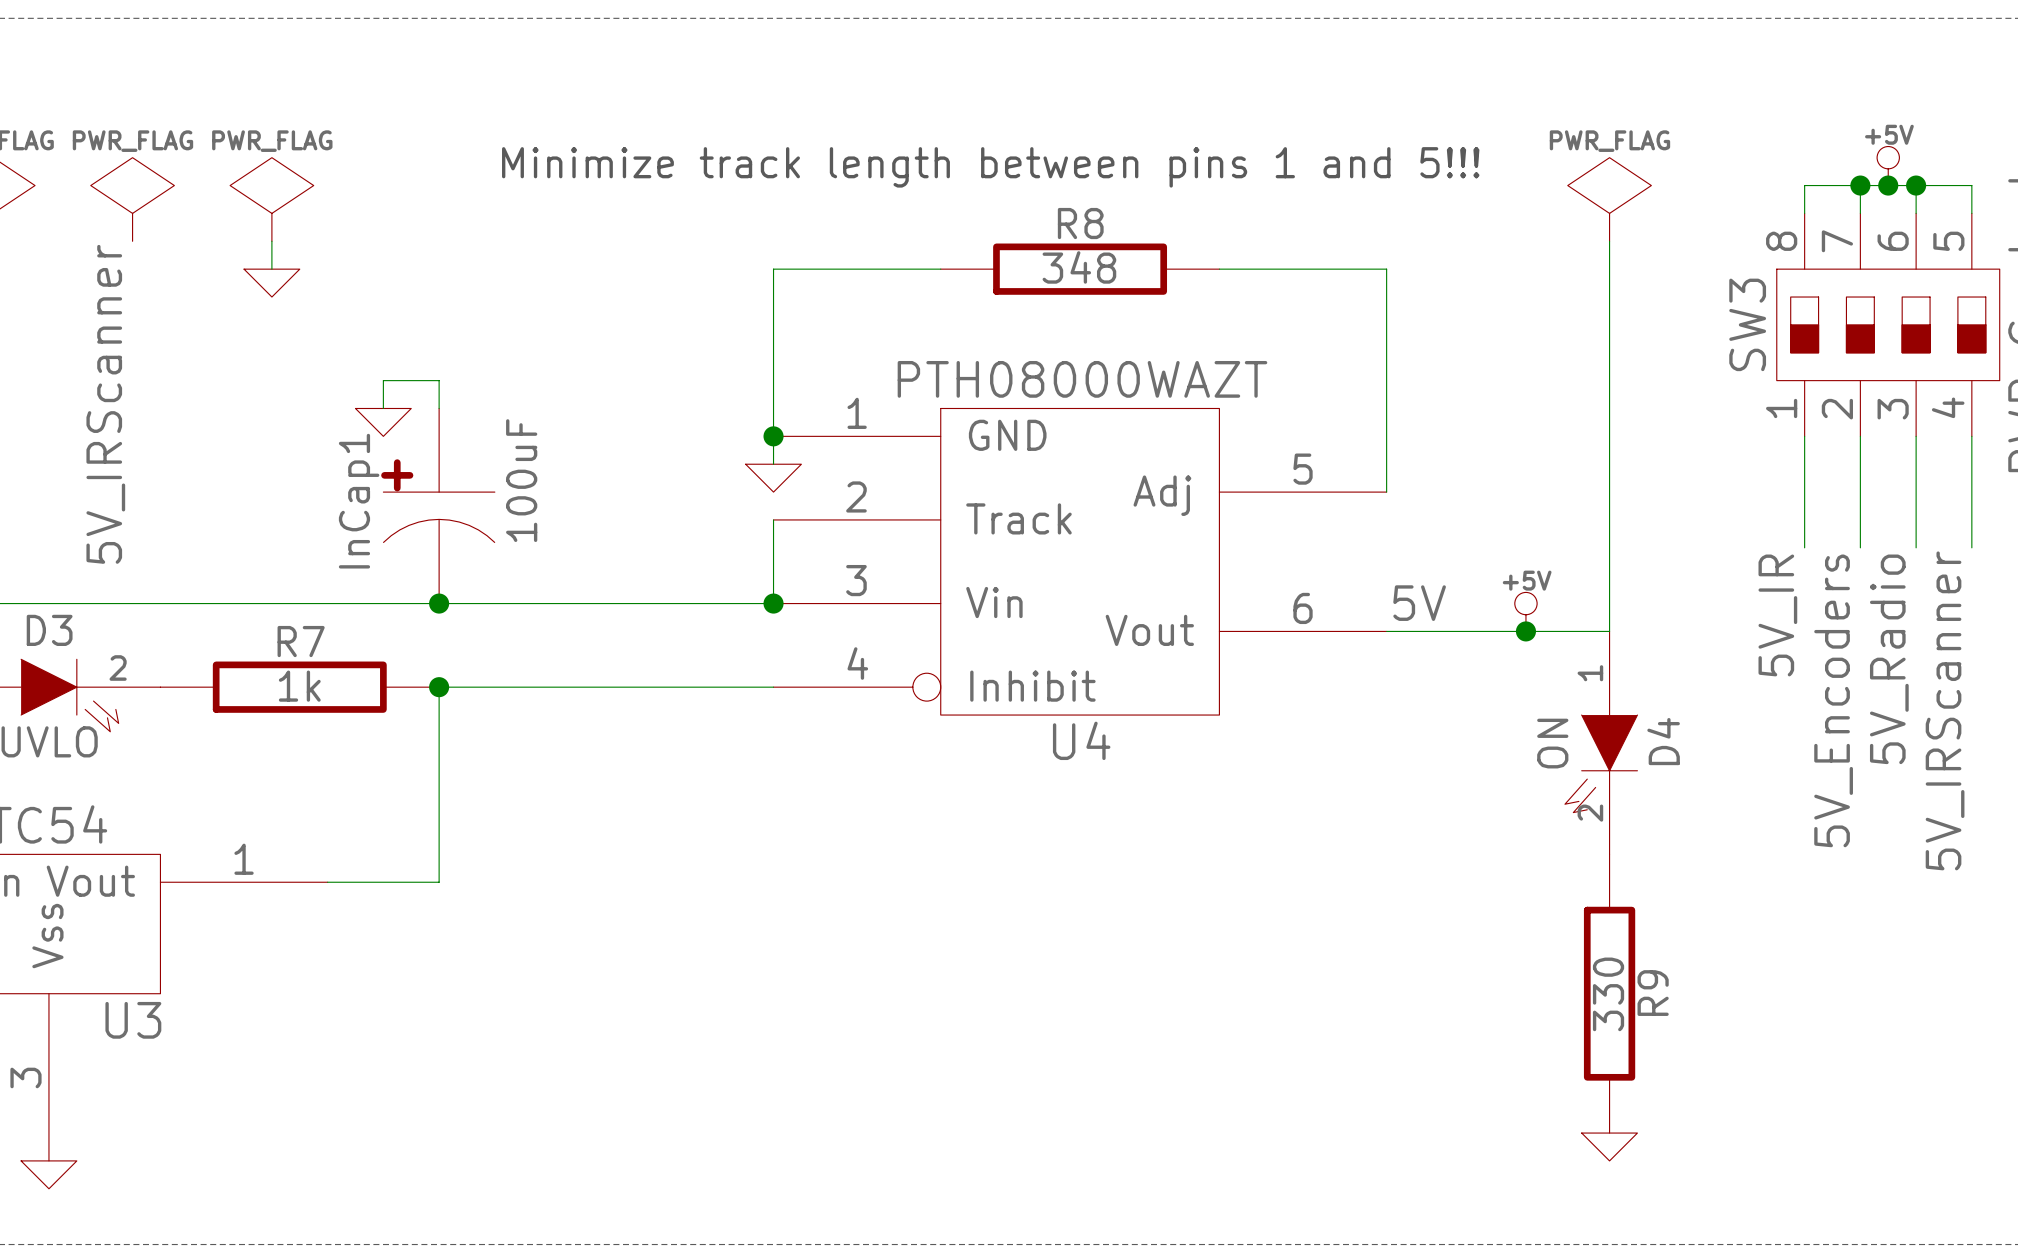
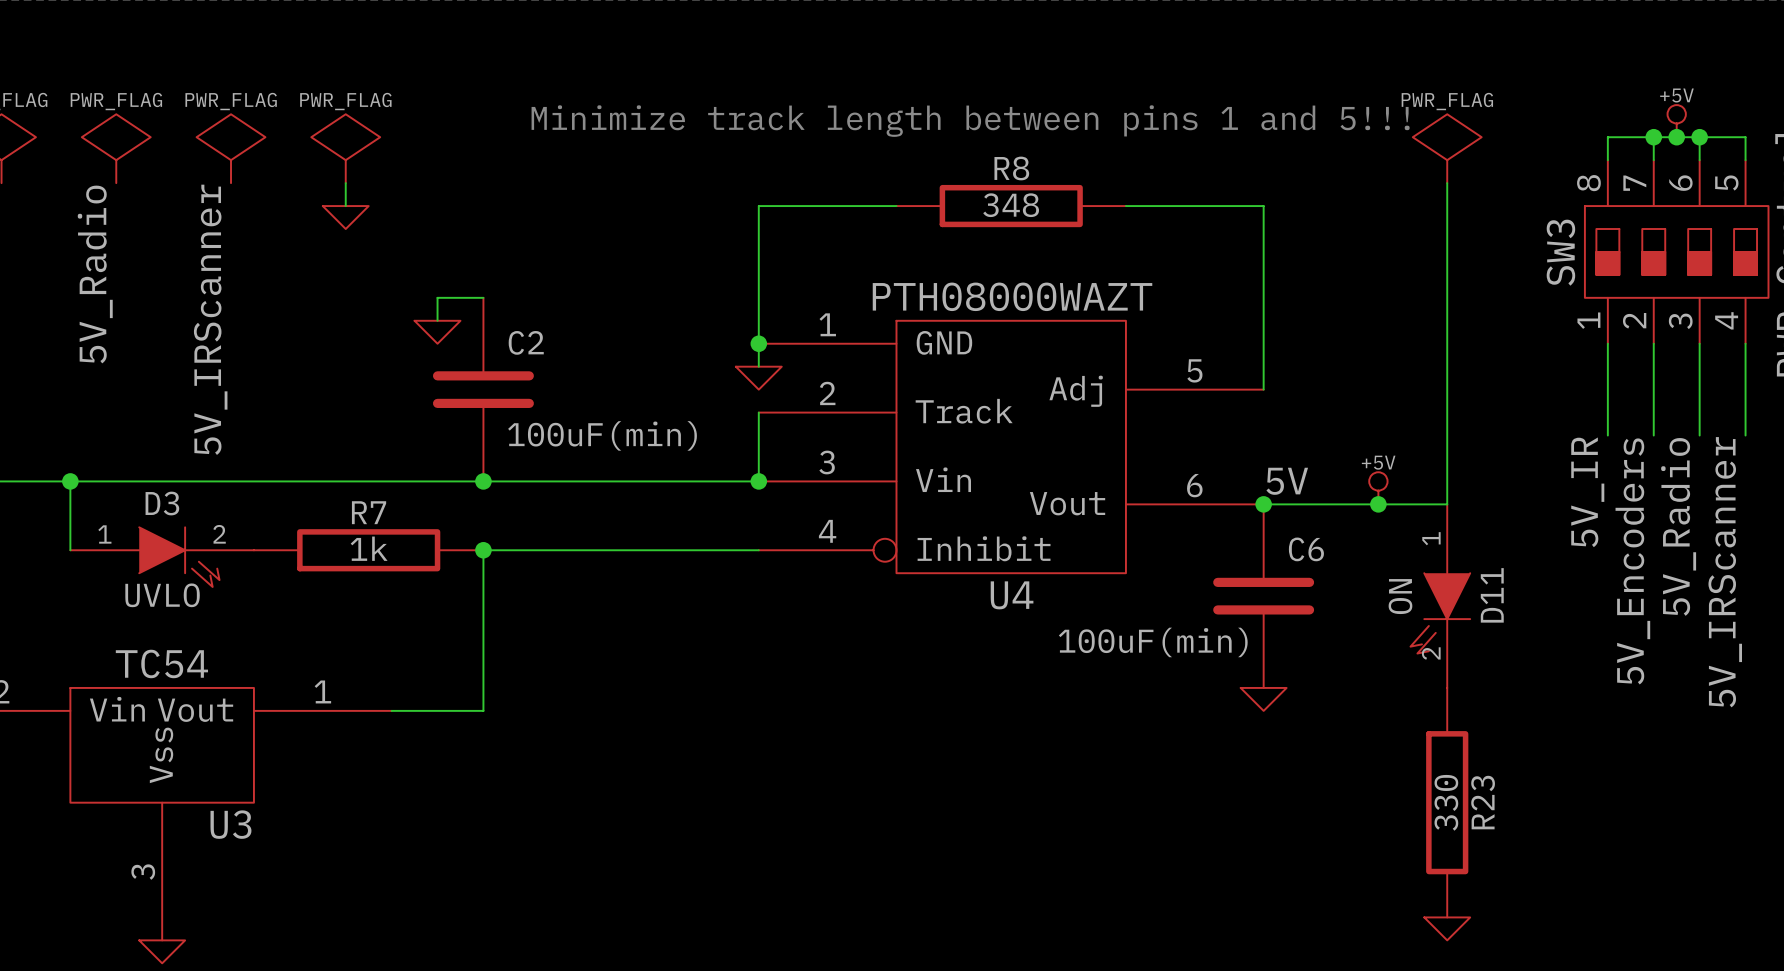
C2: none -> 100uF(min) (483, 389)
InCap1: 100uF (439, 506) -> none
junction: none -> (1263, 504)
D4 name: D4 (1663, 741) -> D11 (1492, 595)
C6: none -> 100uF(min) (1263, 596)
power symbol: none -> (1263, 699)
R9 name: R9 (1653, 993) -> R23 (1483, 802)

